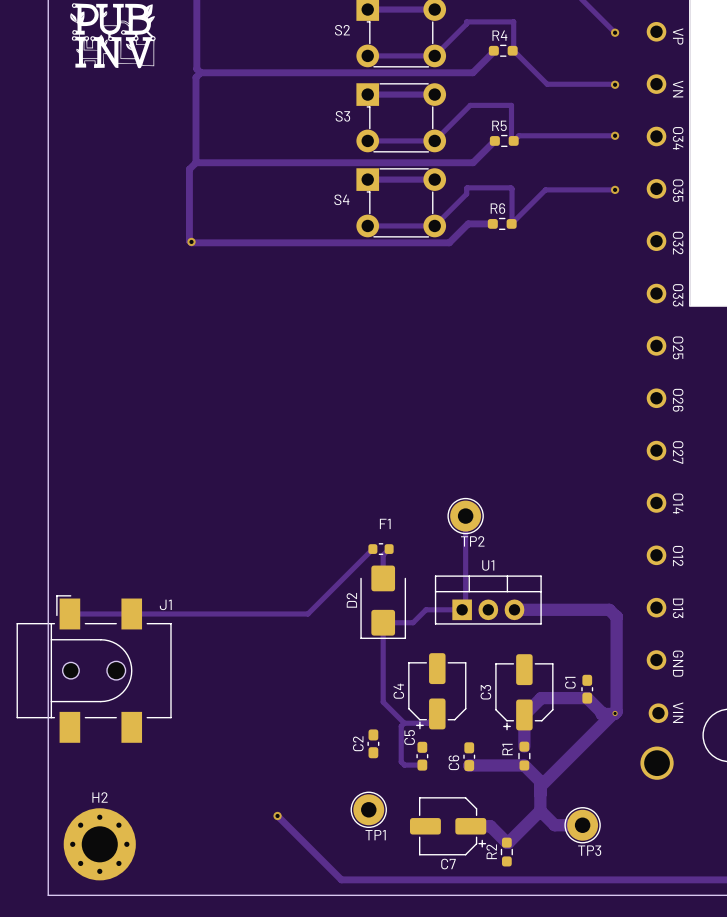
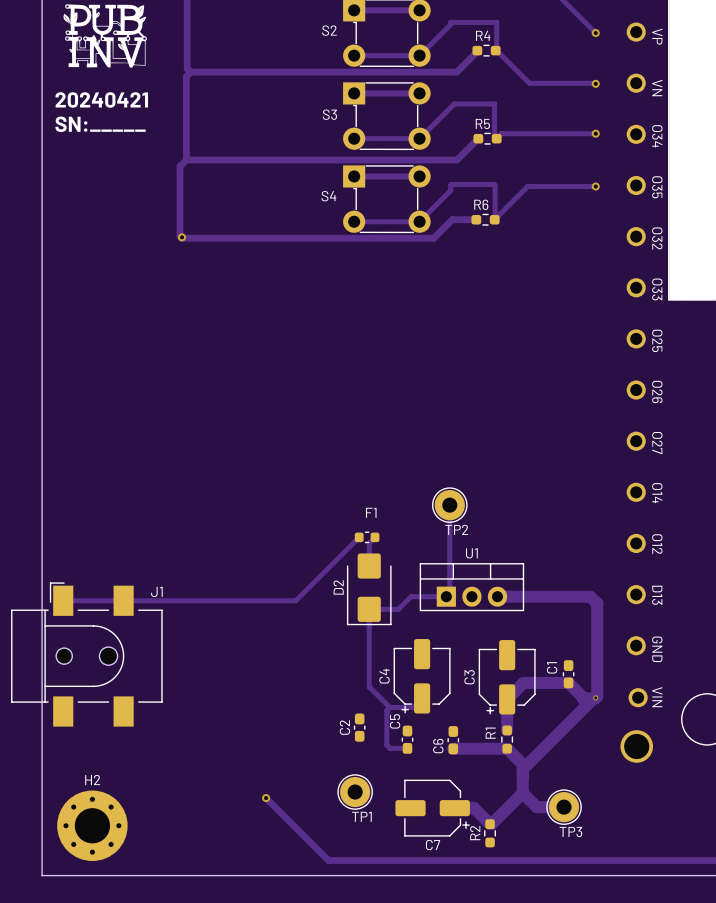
text: none -> 20240421 (101, 99)
text: none -> SN:_____ (100, 124)

